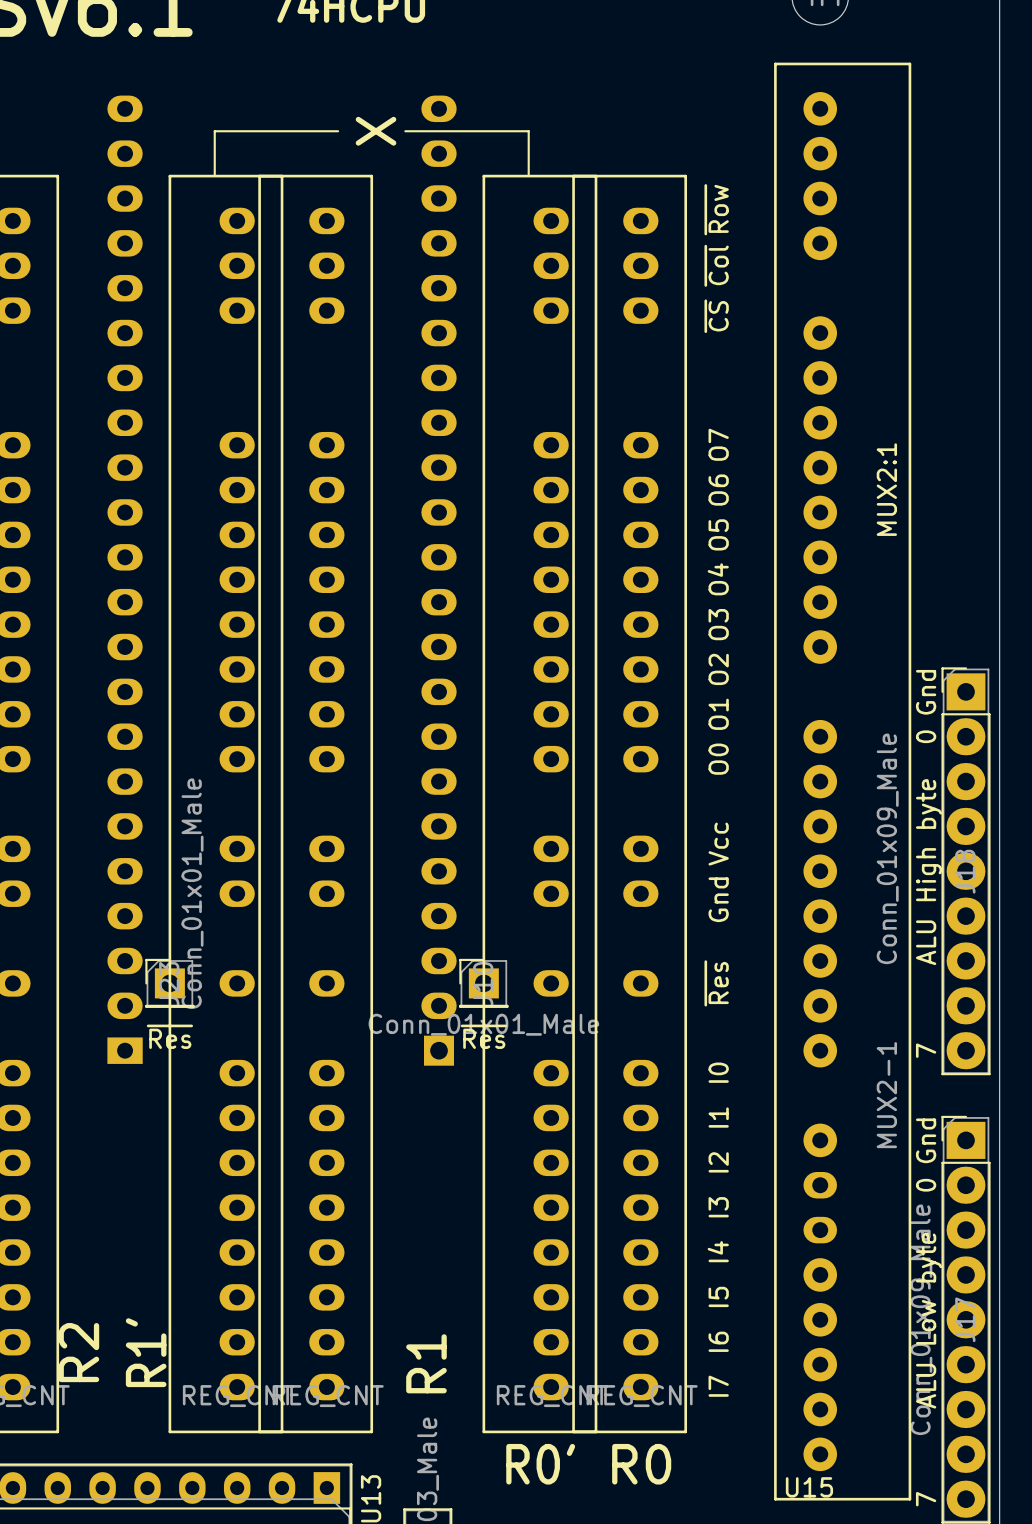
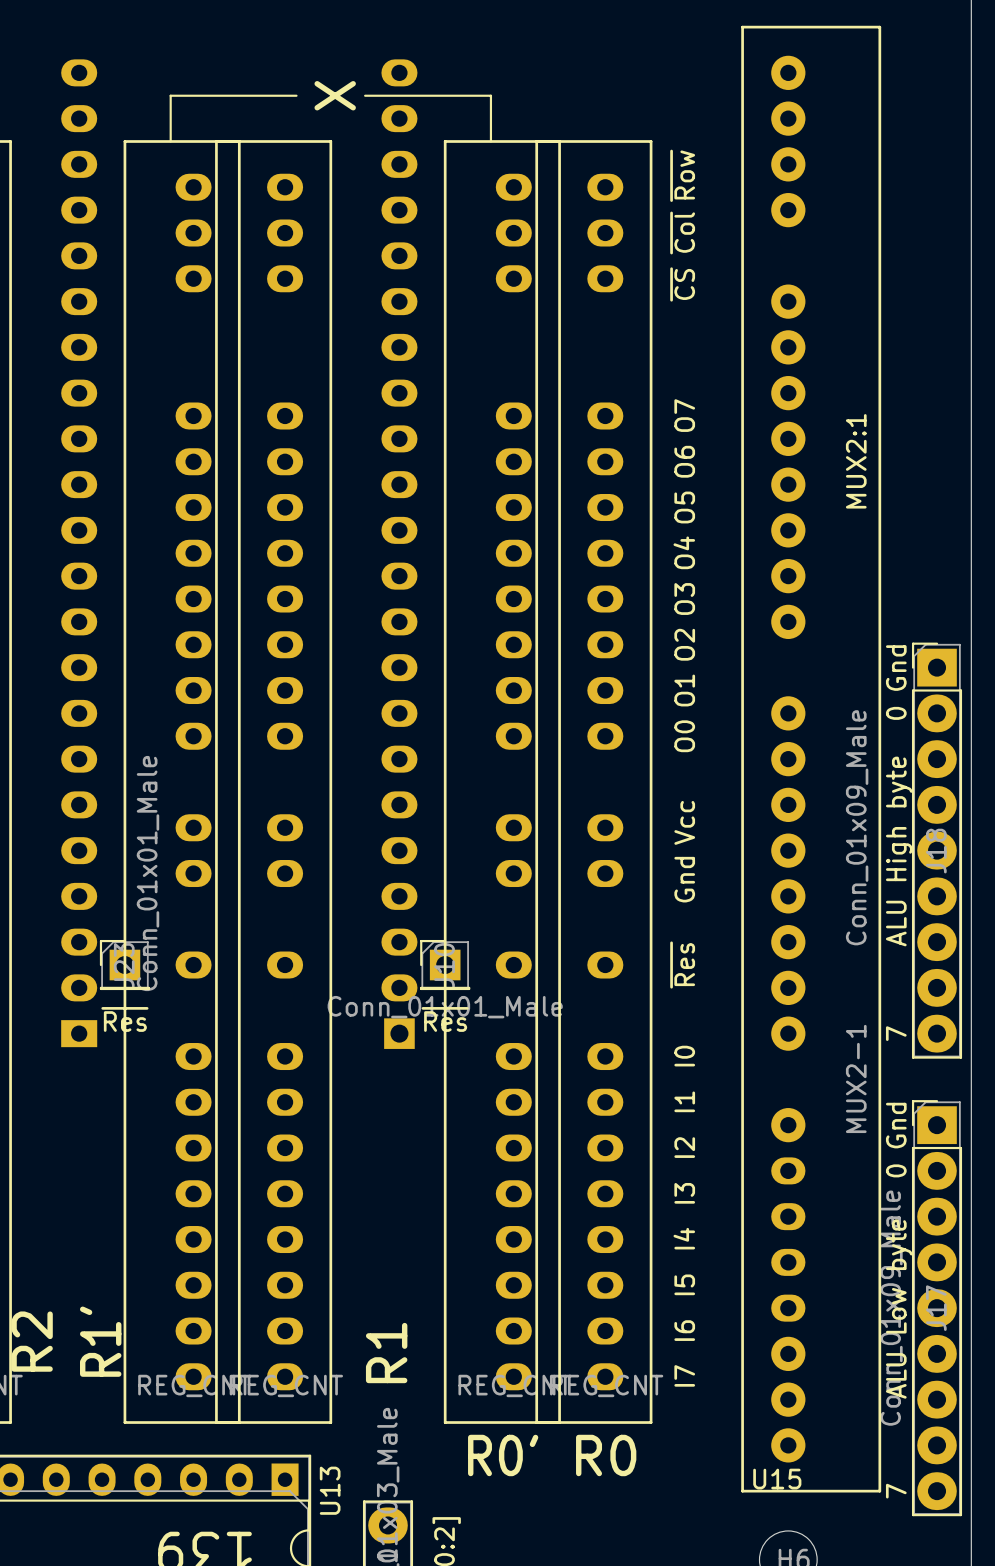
U15 footprint: [774, 62, 912, 1501] -> [741, 25, 882, 1493]

